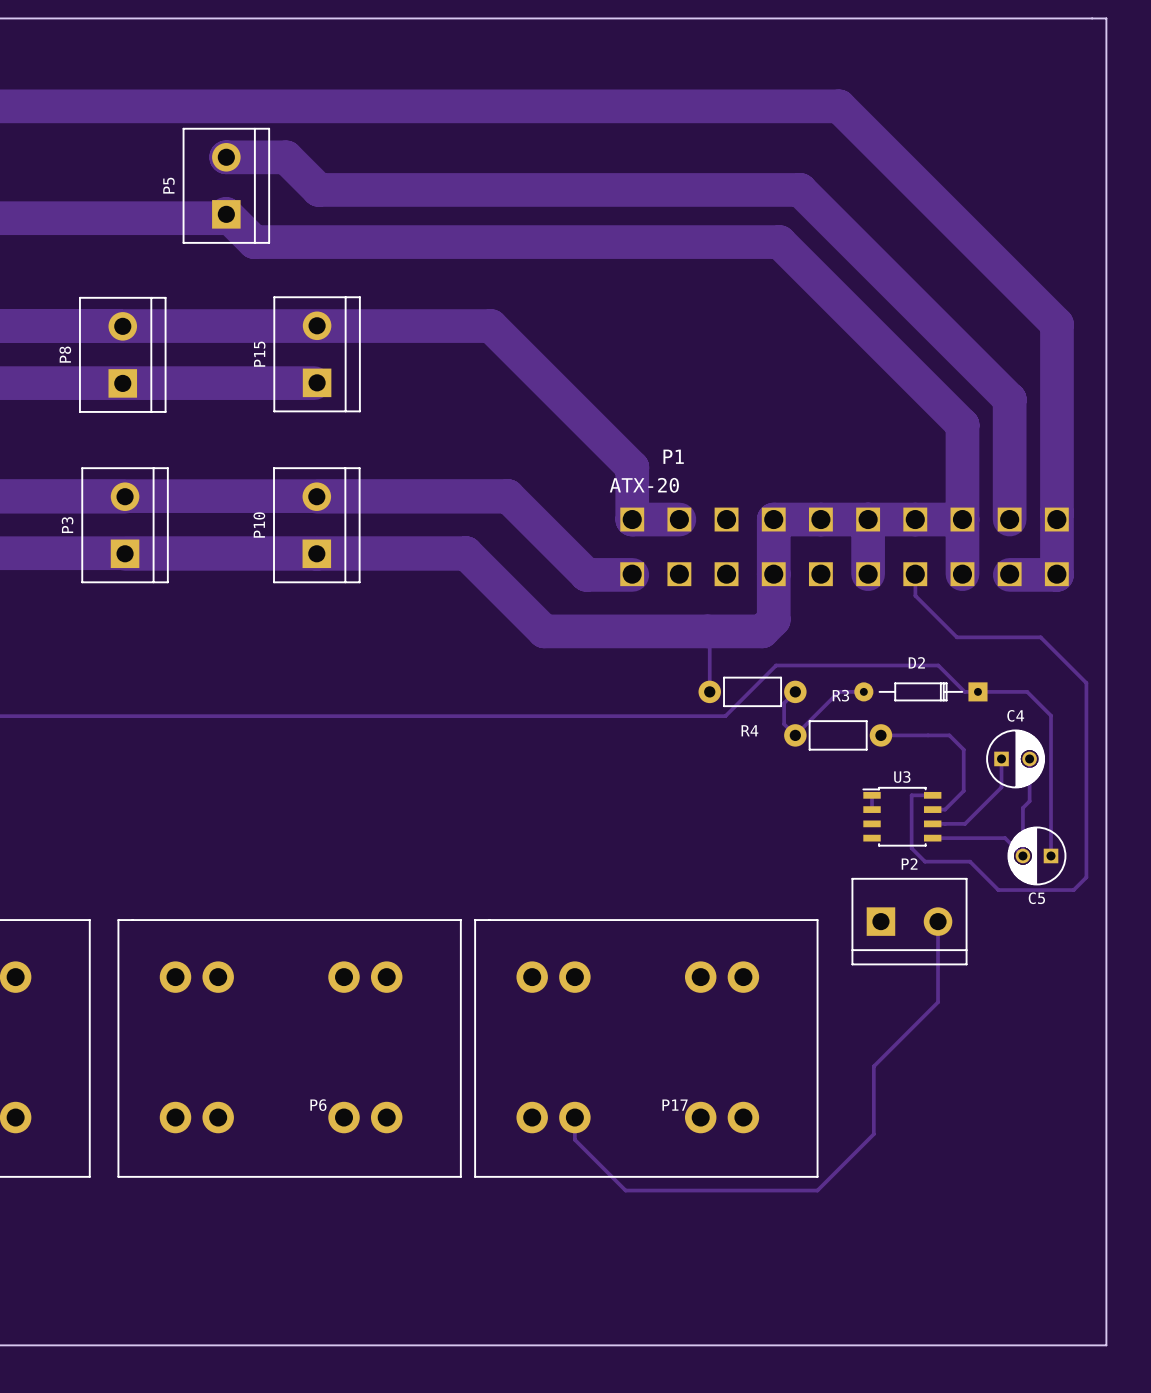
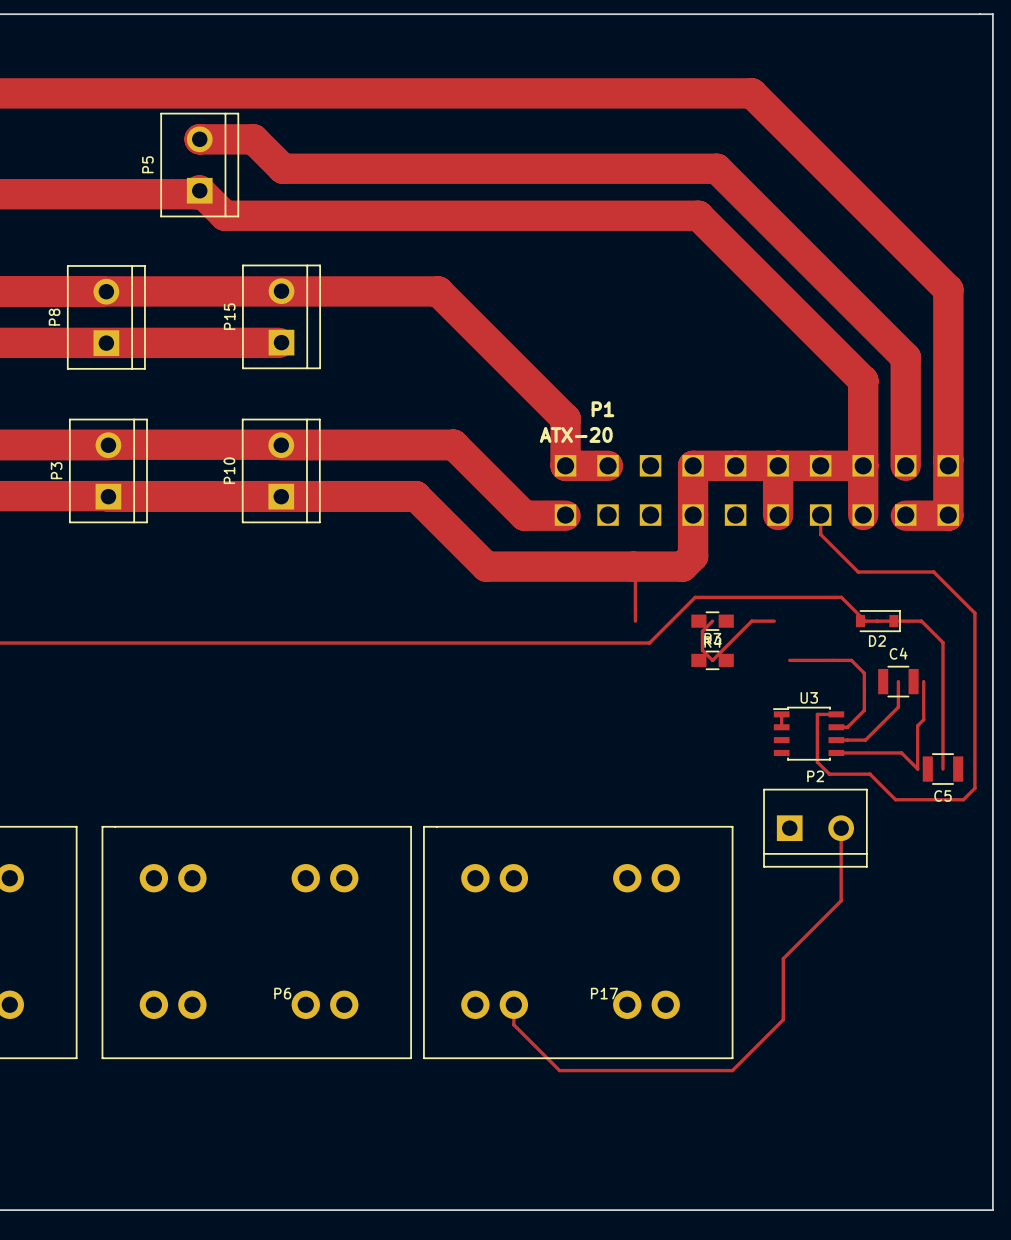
D2 name position: D2 (916, 662) -> D2 (877, 641)
R4 footprint: [698, 676, 807, 708] -> [691, 611, 734, 631]
D2 footprint: [854, 682, 988, 702] -> [855, 610, 901, 632]
R3 footprint: [784, 720, 893, 751] -> [691, 650, 734, 670]
C4 footprint: [986, 729, 1045, 789] -> [878, 666, 919, 698]
C5 footprint: [1007, 826, 1067, 886] -> [922, 753, 964, 785]

